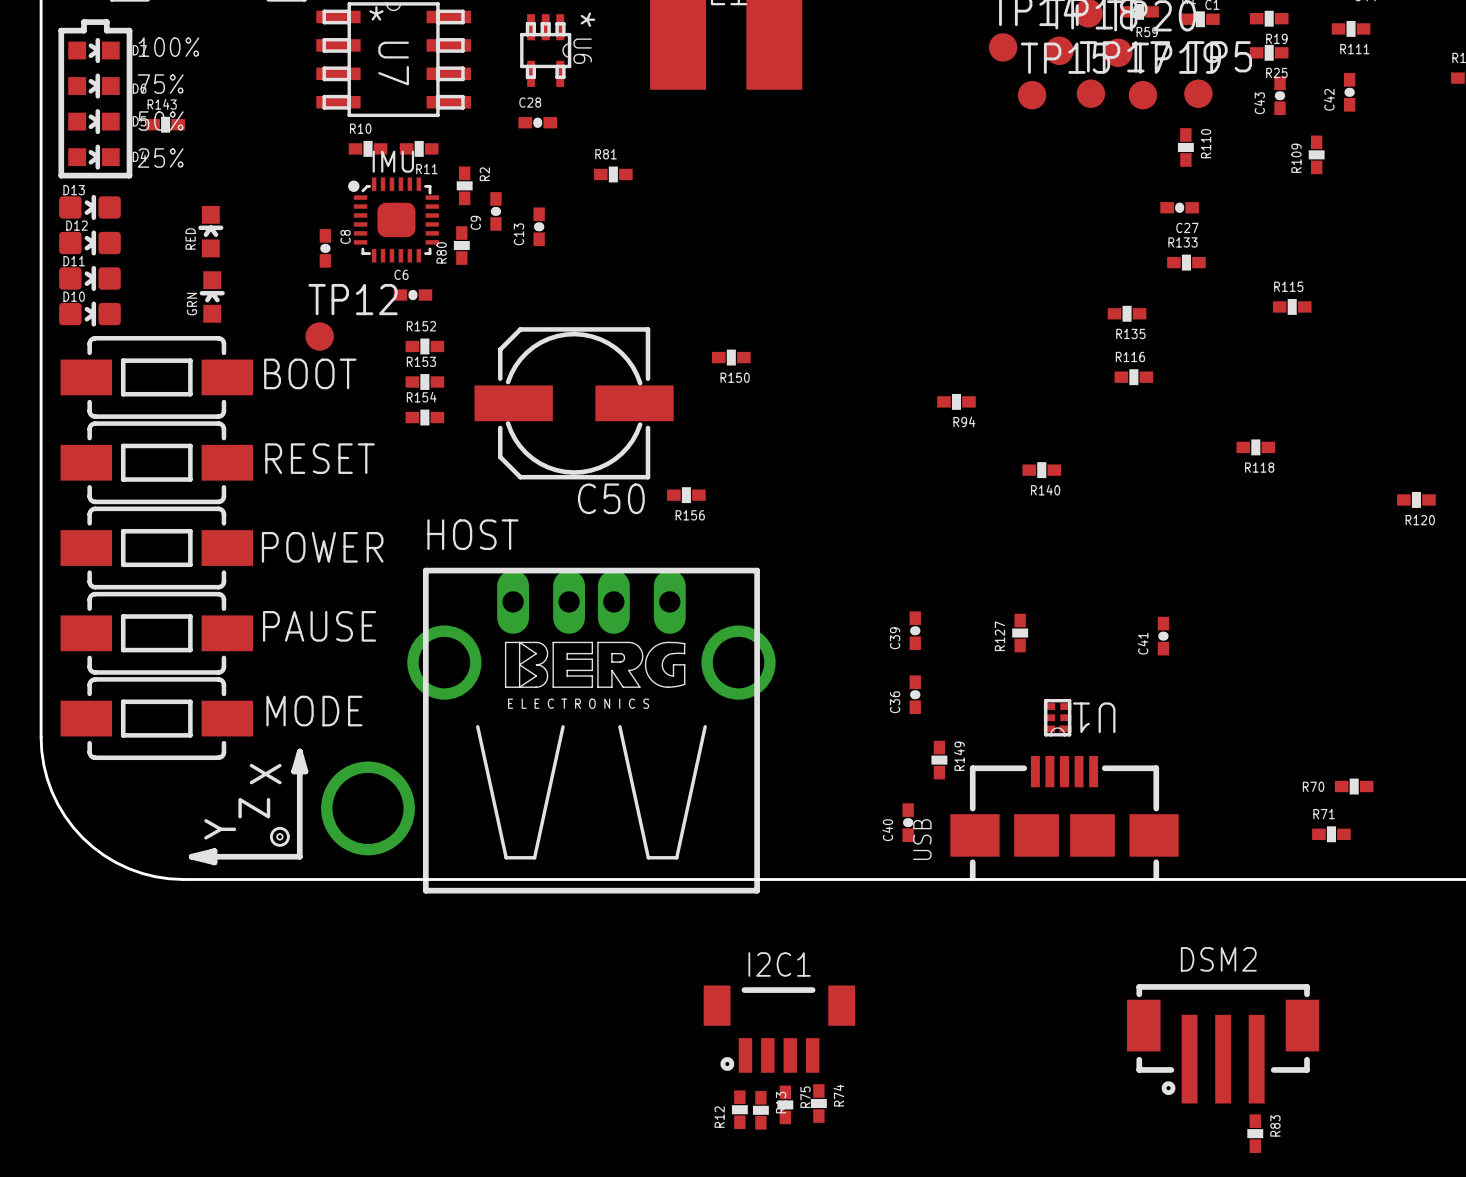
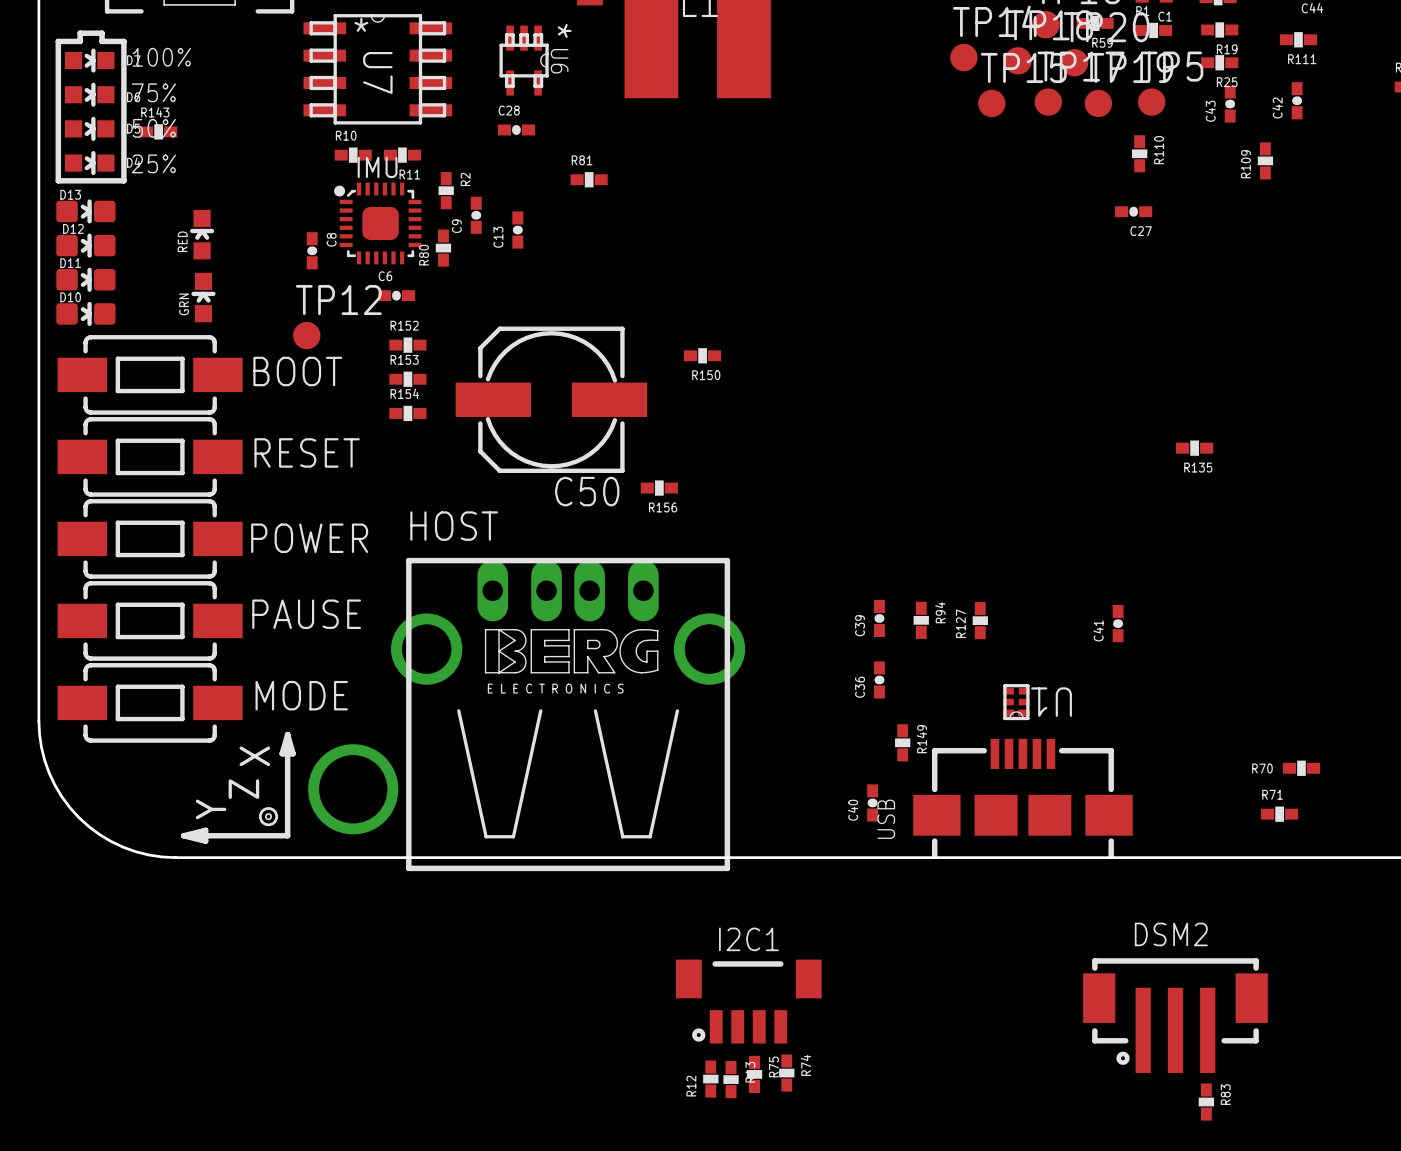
R133: (1186, 262) -> none
R115: (1292, 306) -> none
R135 position: (1127, 313) -> (1194, 448)
R116: (1133, 377) -> none
R94 rotation: 0° (956, 401) -> 90° clockwise (921, 620)
R94 position: (956, 401) -> (921, 620)
R118: (1255, 447) -> none
R140: (1041, 470) -> none
R120: (1416, 499) -> none

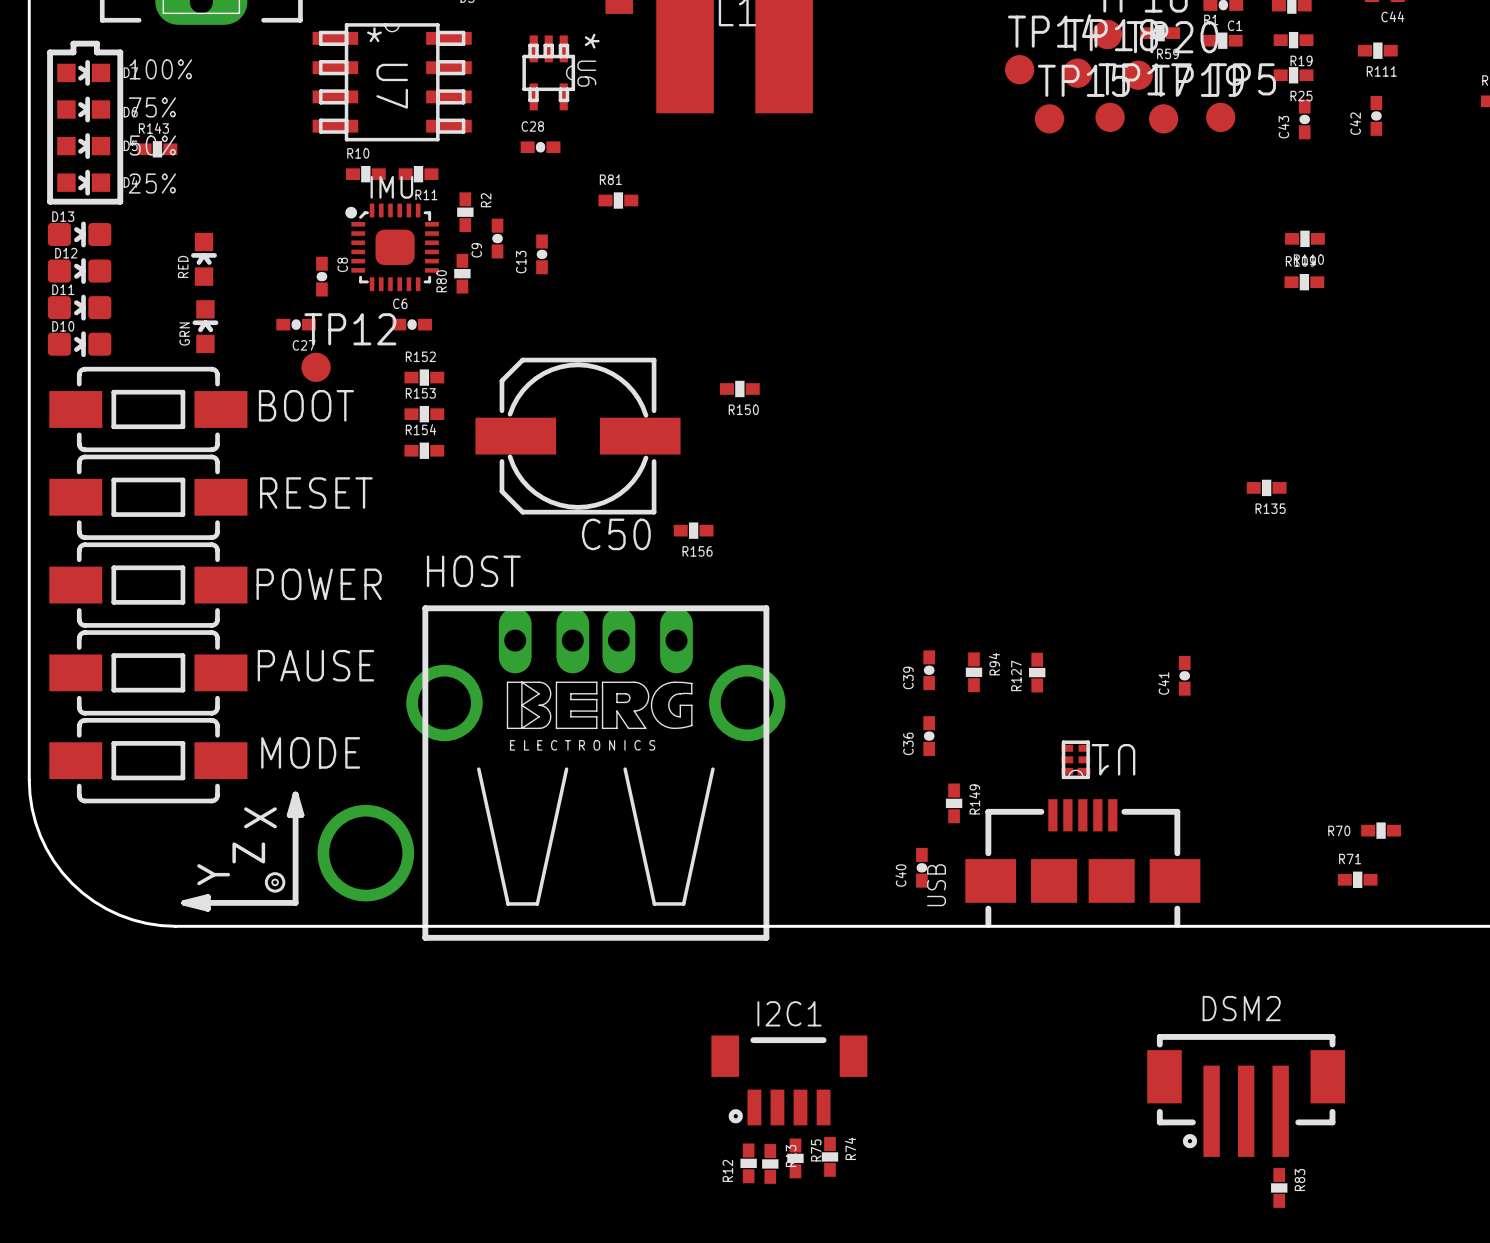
R110 rotation: 0° (1139, 153) -> 90° clockwise (1304, 238)
R110 position: (1139, 153) -> (1304, 238)
R109 rotation: 0° (1265, 160) -> 90° clockwise (1304, 282)
R109 position: (1265, 160) -> (1304, 282)
C27 position: (1133, 211) -> (296, 324)

